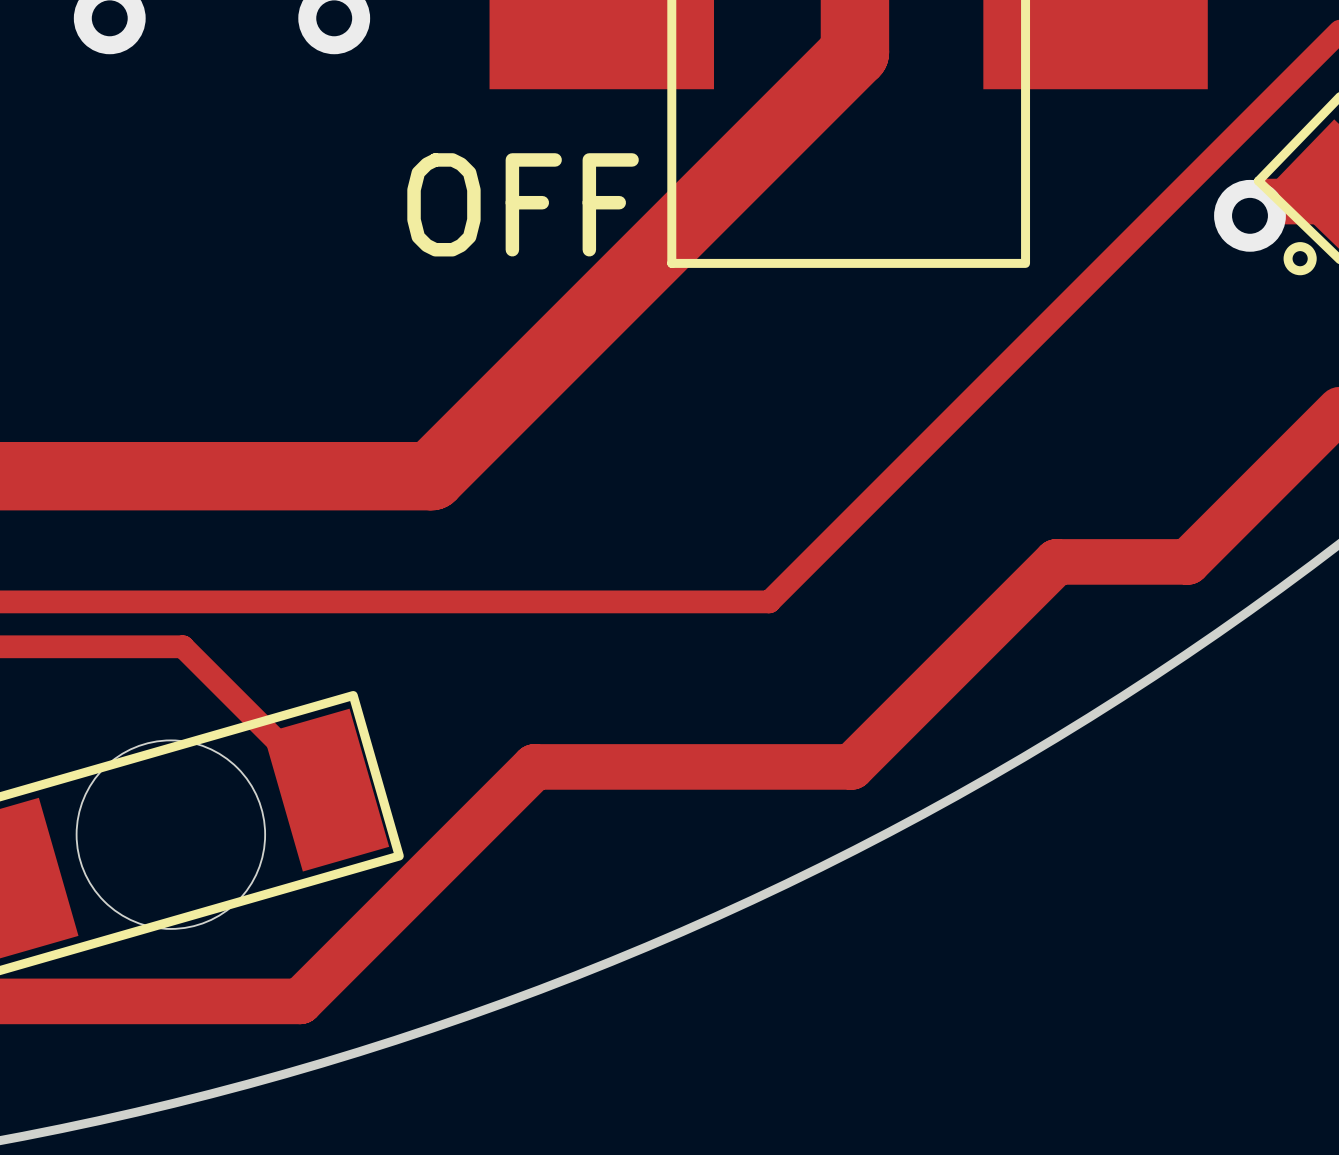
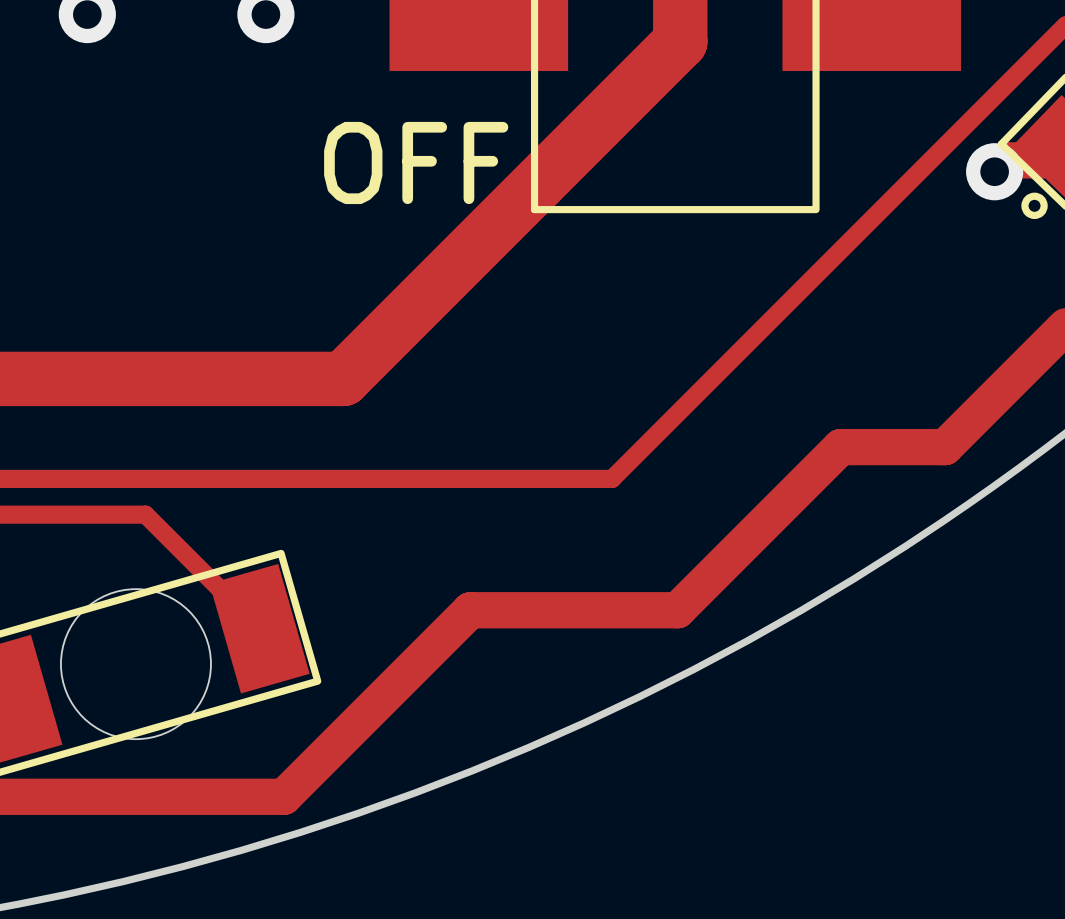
track: (591, 766) (534, 766) (300, 1001) -> (470, 610) (283, 796) (238, 796)

